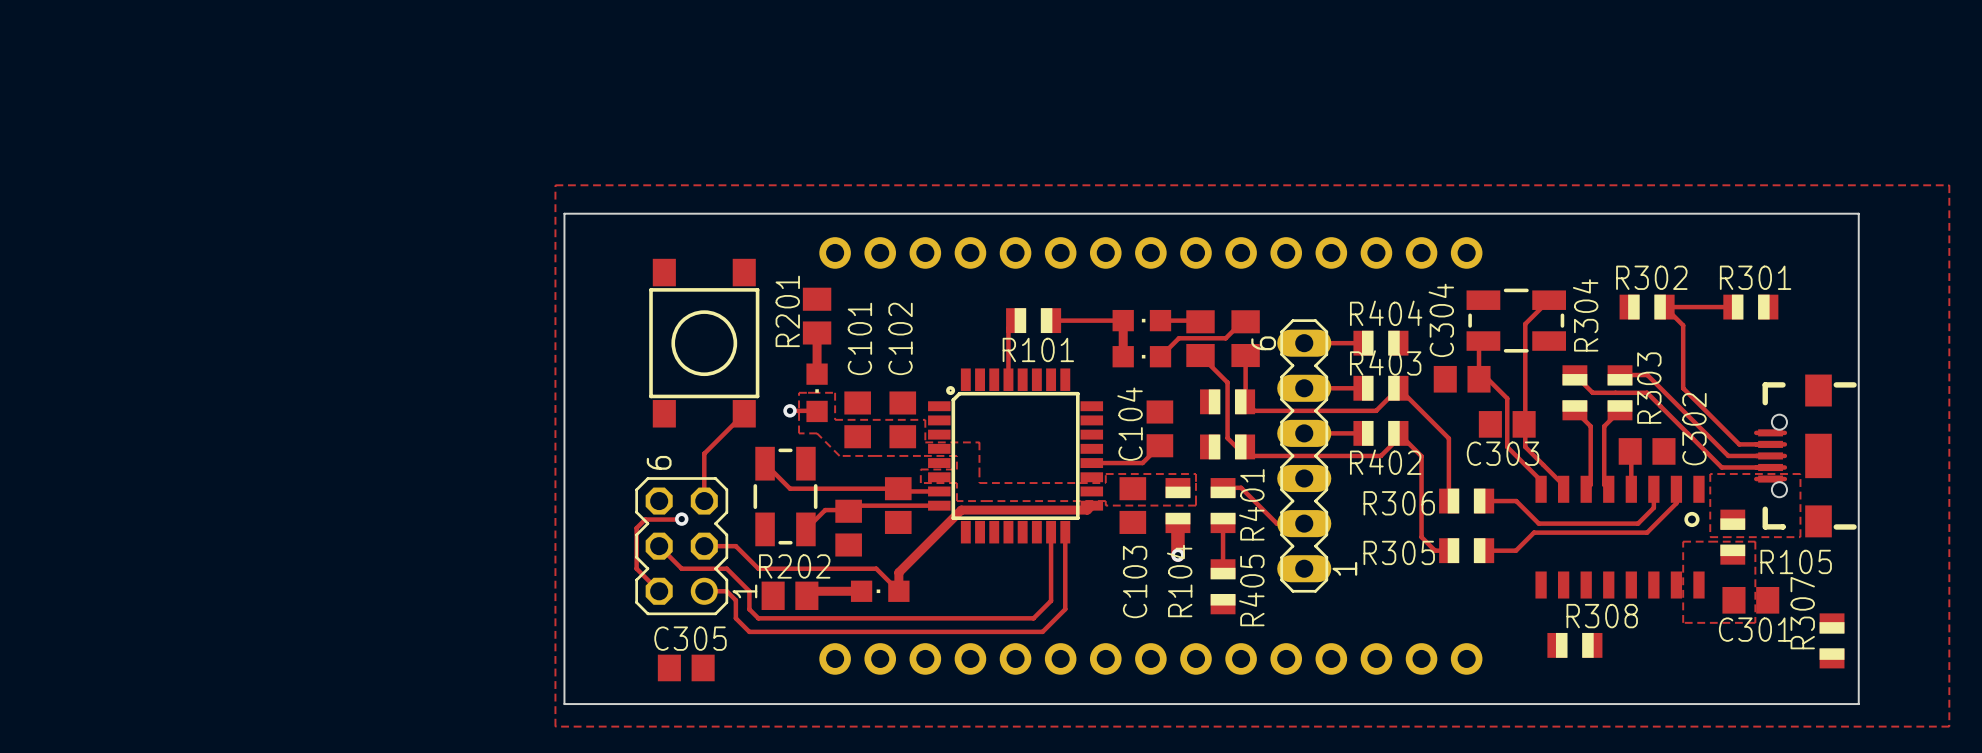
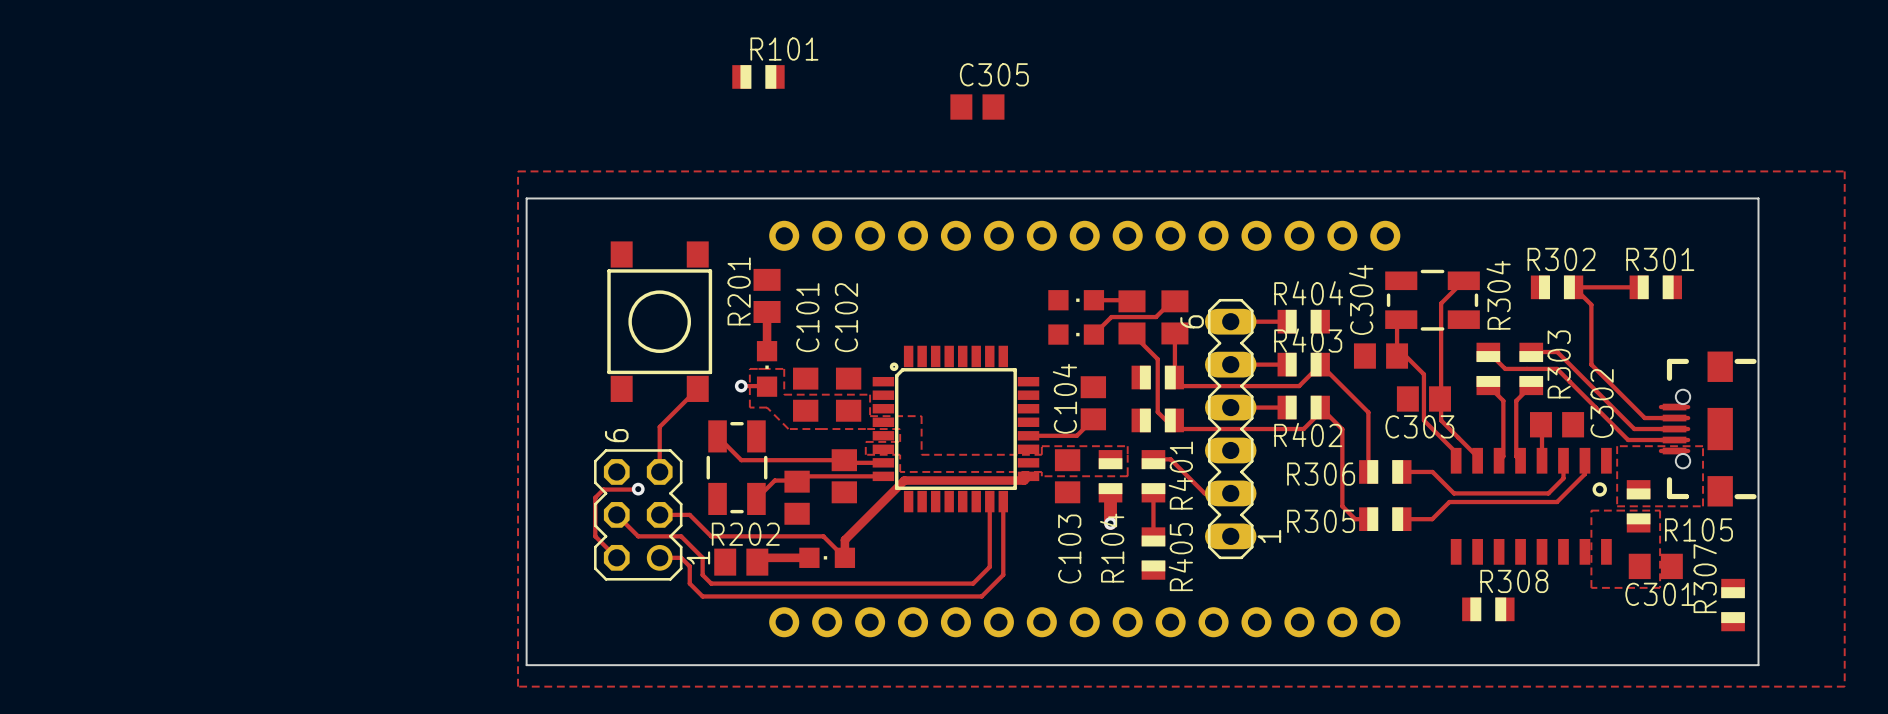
track: (1015, 320) (1008, 328) (1008, 379) -> none
R101 position: (1033, 320) -> (758, 76)
track: (1051, 320) (1123, 320) (1123, 356) -> none
R101 name position: R101 (1038, 349) -> R101 (784, 49)
C305 name position: C305 (690, 638) -> C305 (994, 74)
C305 position: (686, 667) -> (977, 107)

